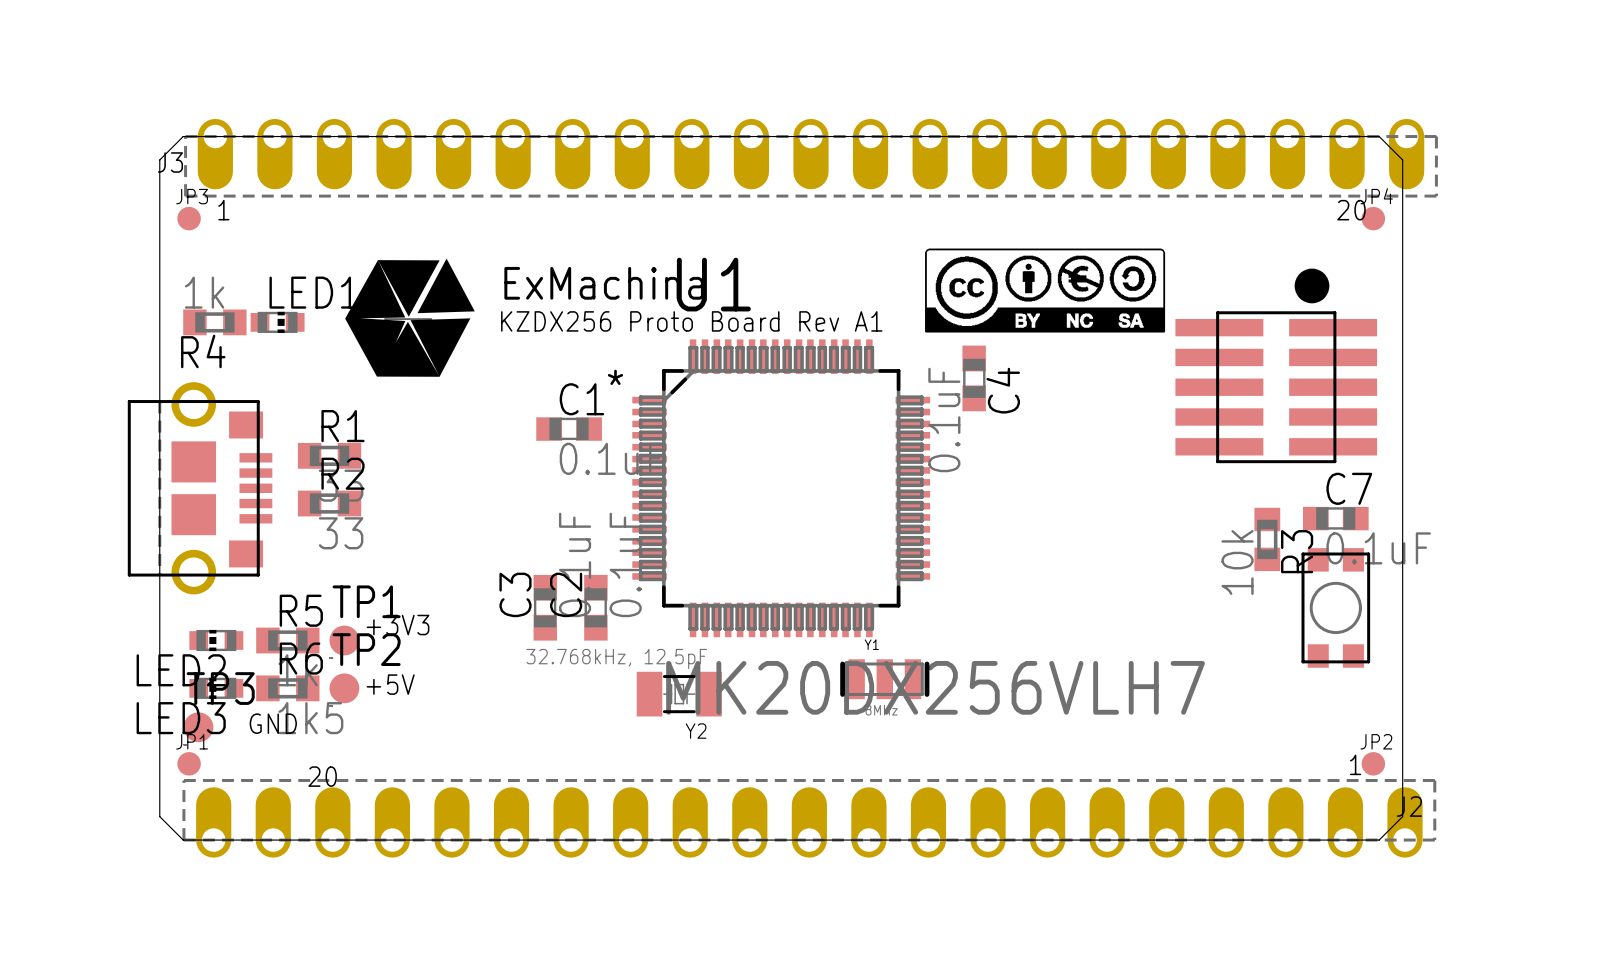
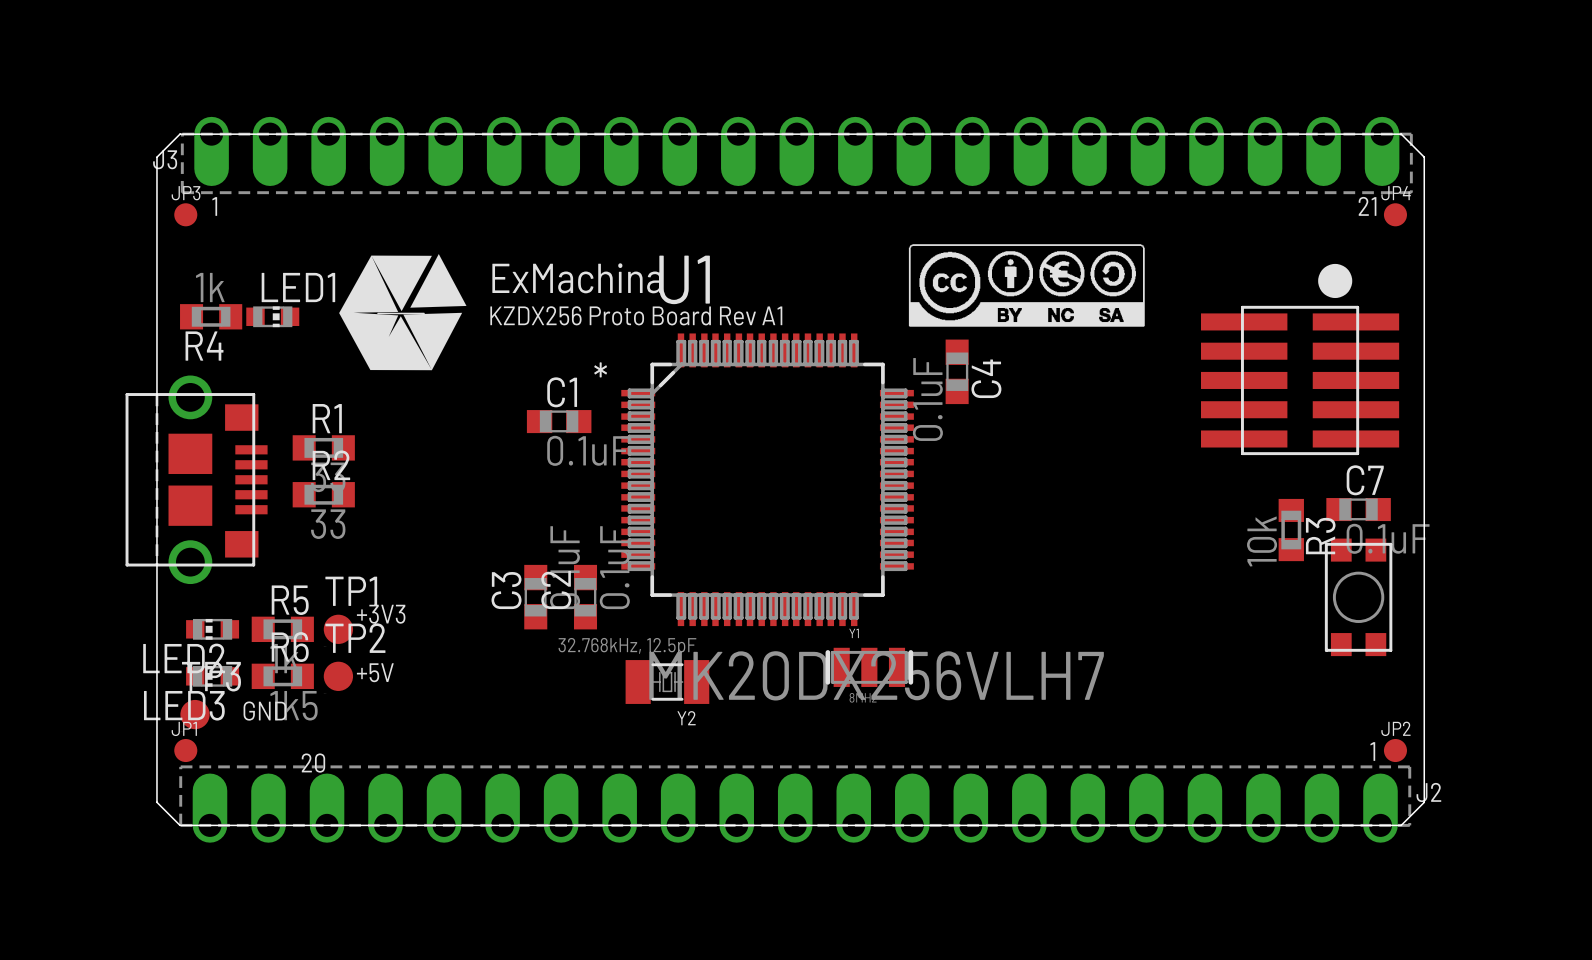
board edge: (1379, 136) (1402, 159) (1402, 816) (1379, 840) -> (1355, 134) (1401, 134) (1424, 157) (1424, 802) (1401, 825) (1355, 825)
text: 20 (1351, 210) -> none
text: none -> 21 (1367, 206)
JP4 position: (1373, 218) -> (1395, 214)
part position: (1276, 365) -> (1300, 359)
C7 position: (1335, 518) -> (1358, 509)
R3 position: (1267, 539) -> (1291, 530)
part position: (1335, 607) -> (1358, 597)
JP2 position: (1373, 763) -> (1395, 750)
text position: 1 (1355, 764) -> 1 (1372, 751)
text position: J2 (1409, 806) -> J2 (1428, 792)

